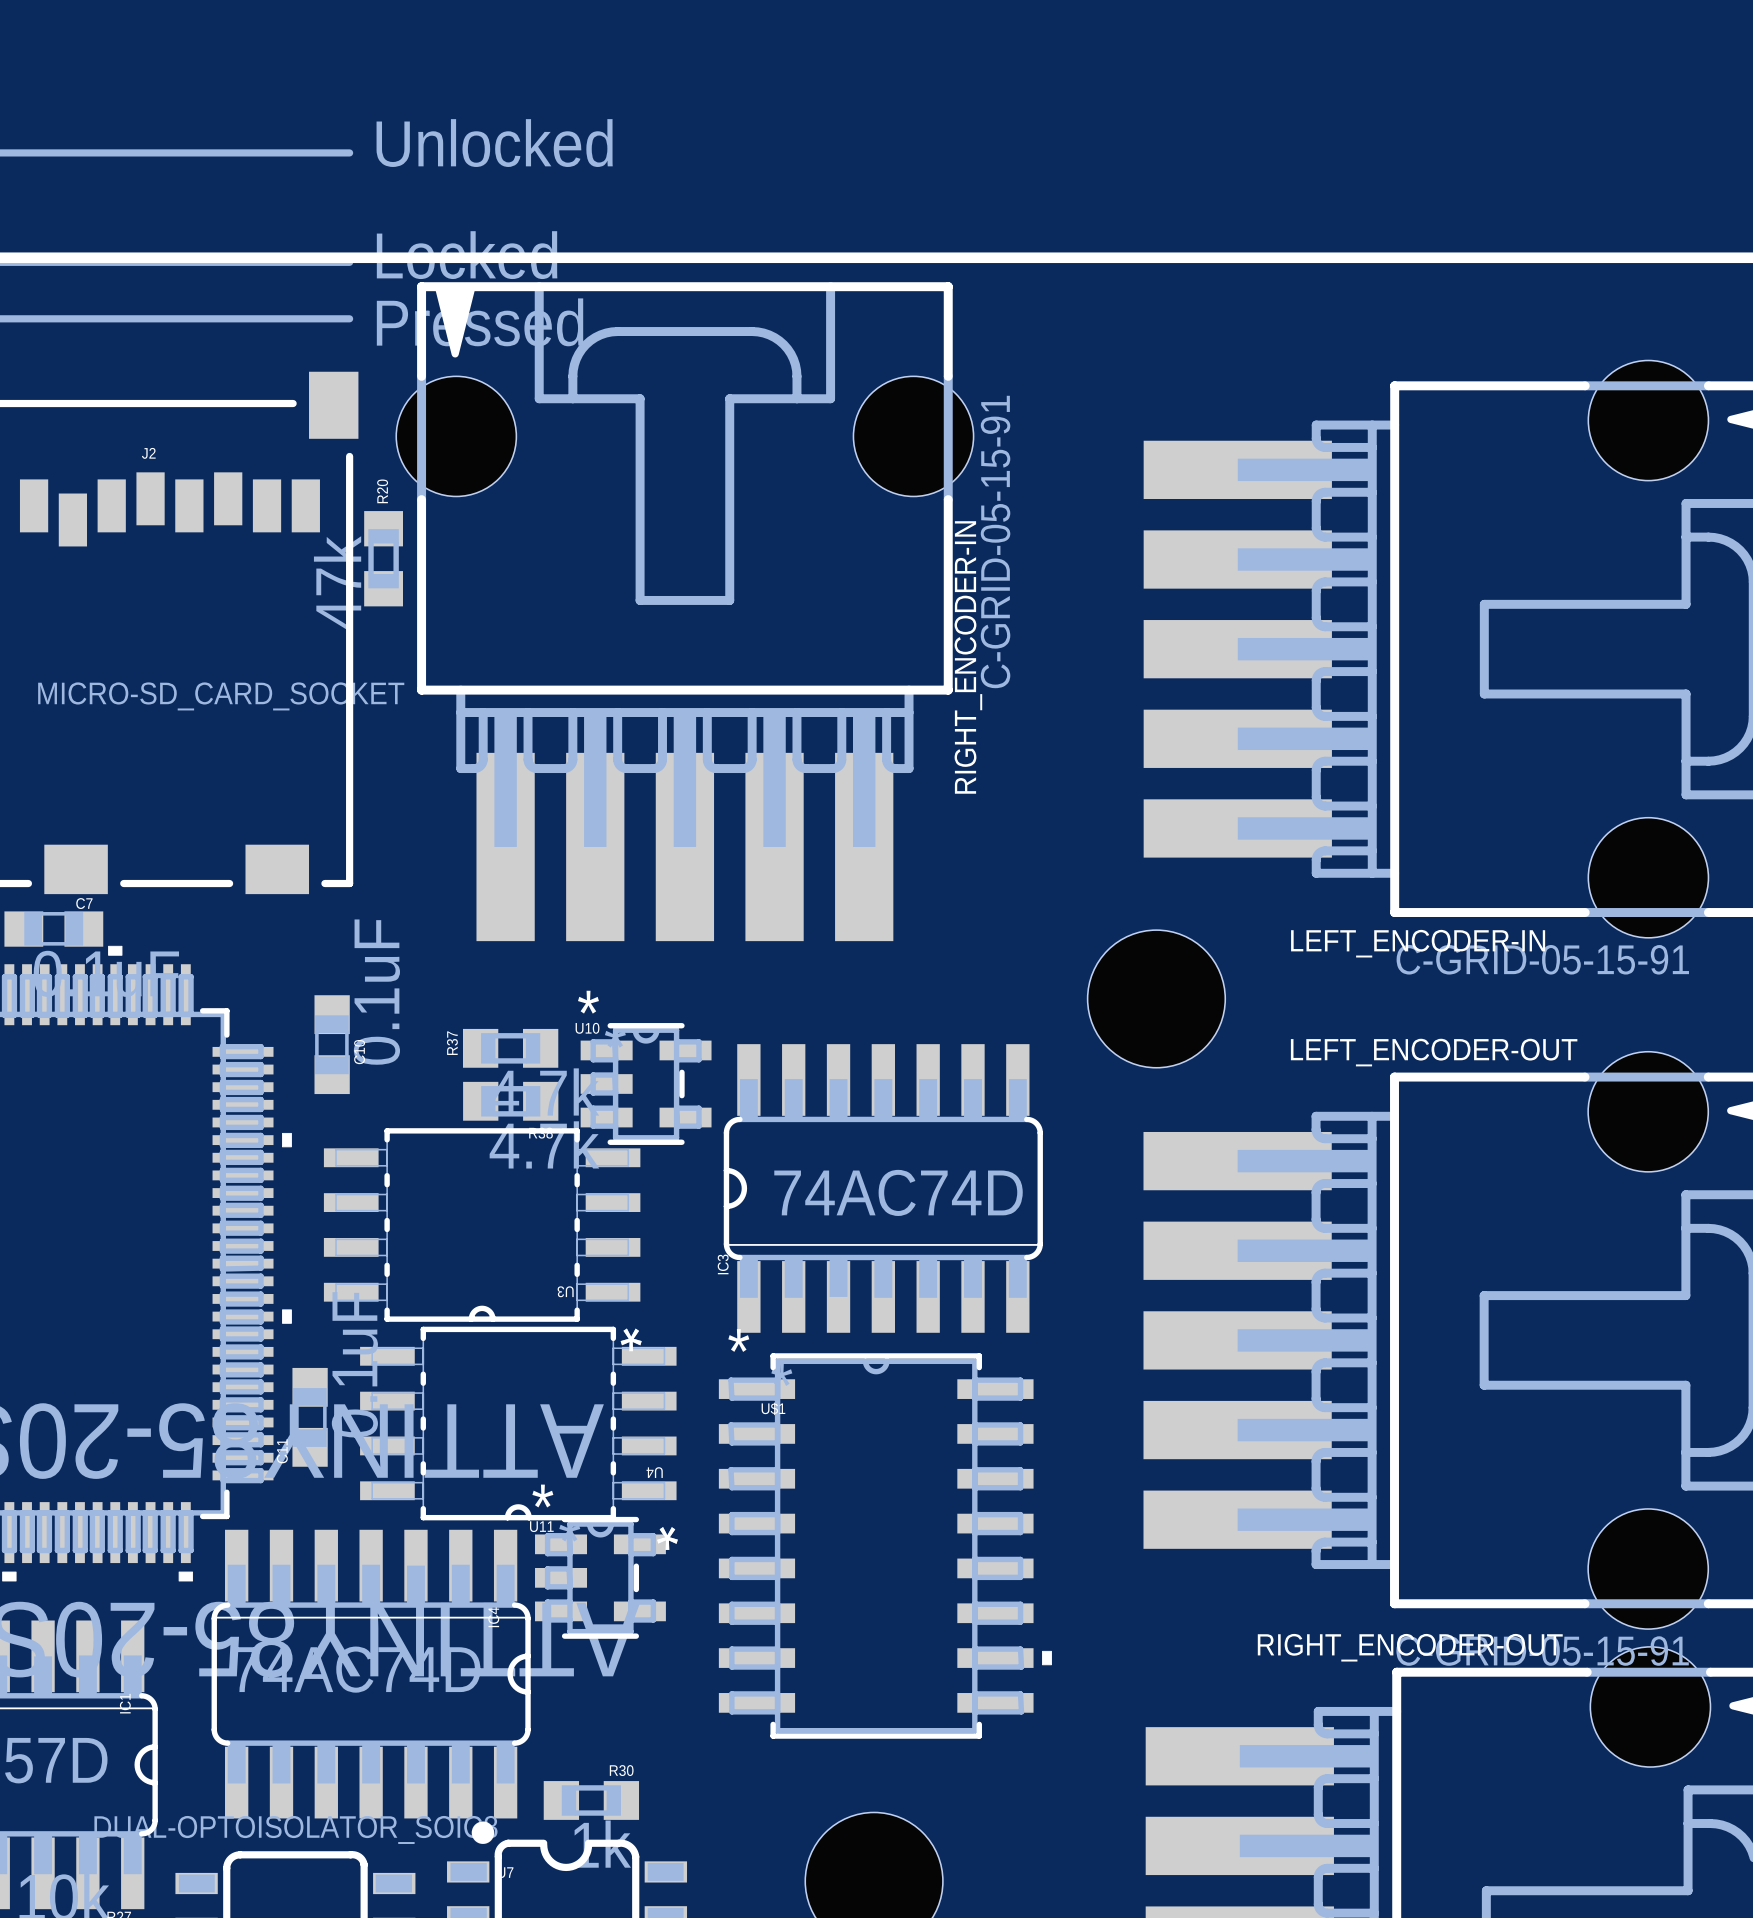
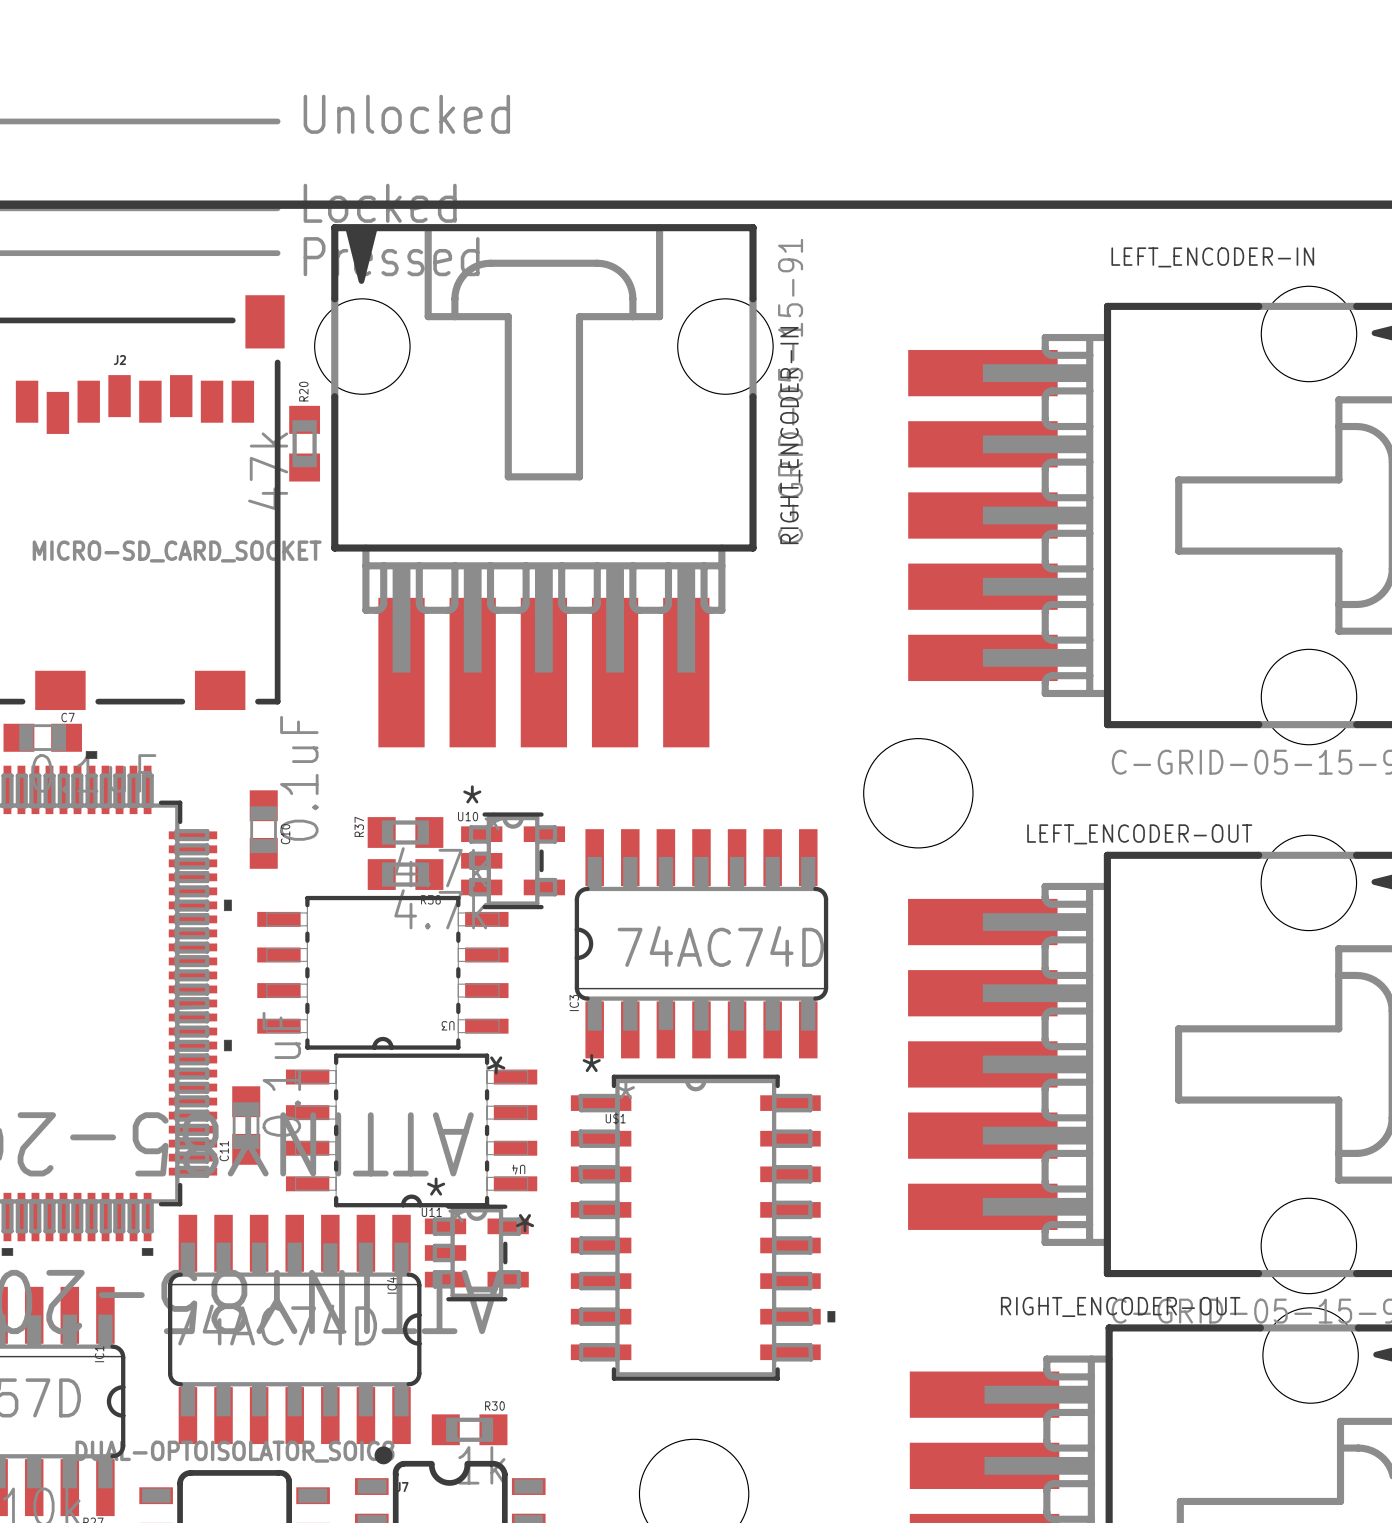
RIGHT_ENCODER-IN name position: RIGHT_ENCODER-IN (968, 657) -> RIGHT_ENCODER-IN (790, 435)
LEFT_ENCODER-IN name position: LEFT_ENCODER-IN (1418, 943) -> LEFT_ENCODER-IN (1212, 257)

